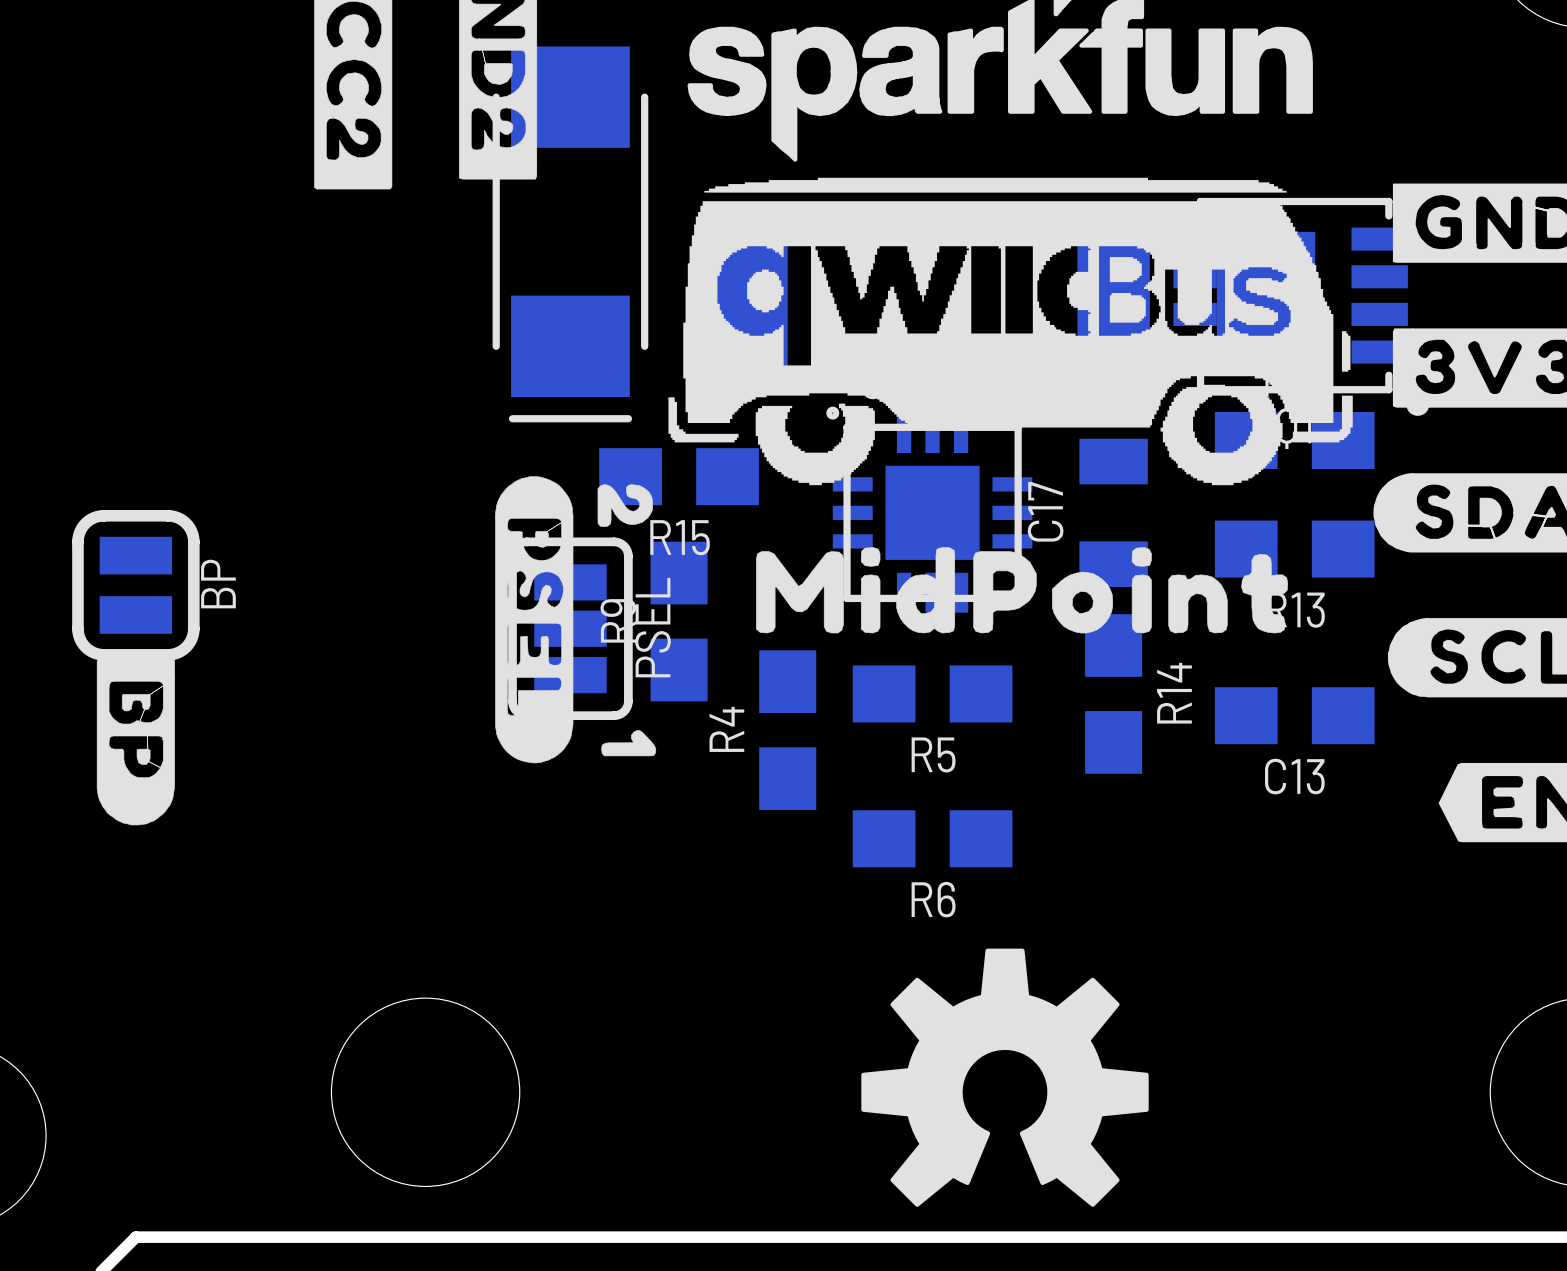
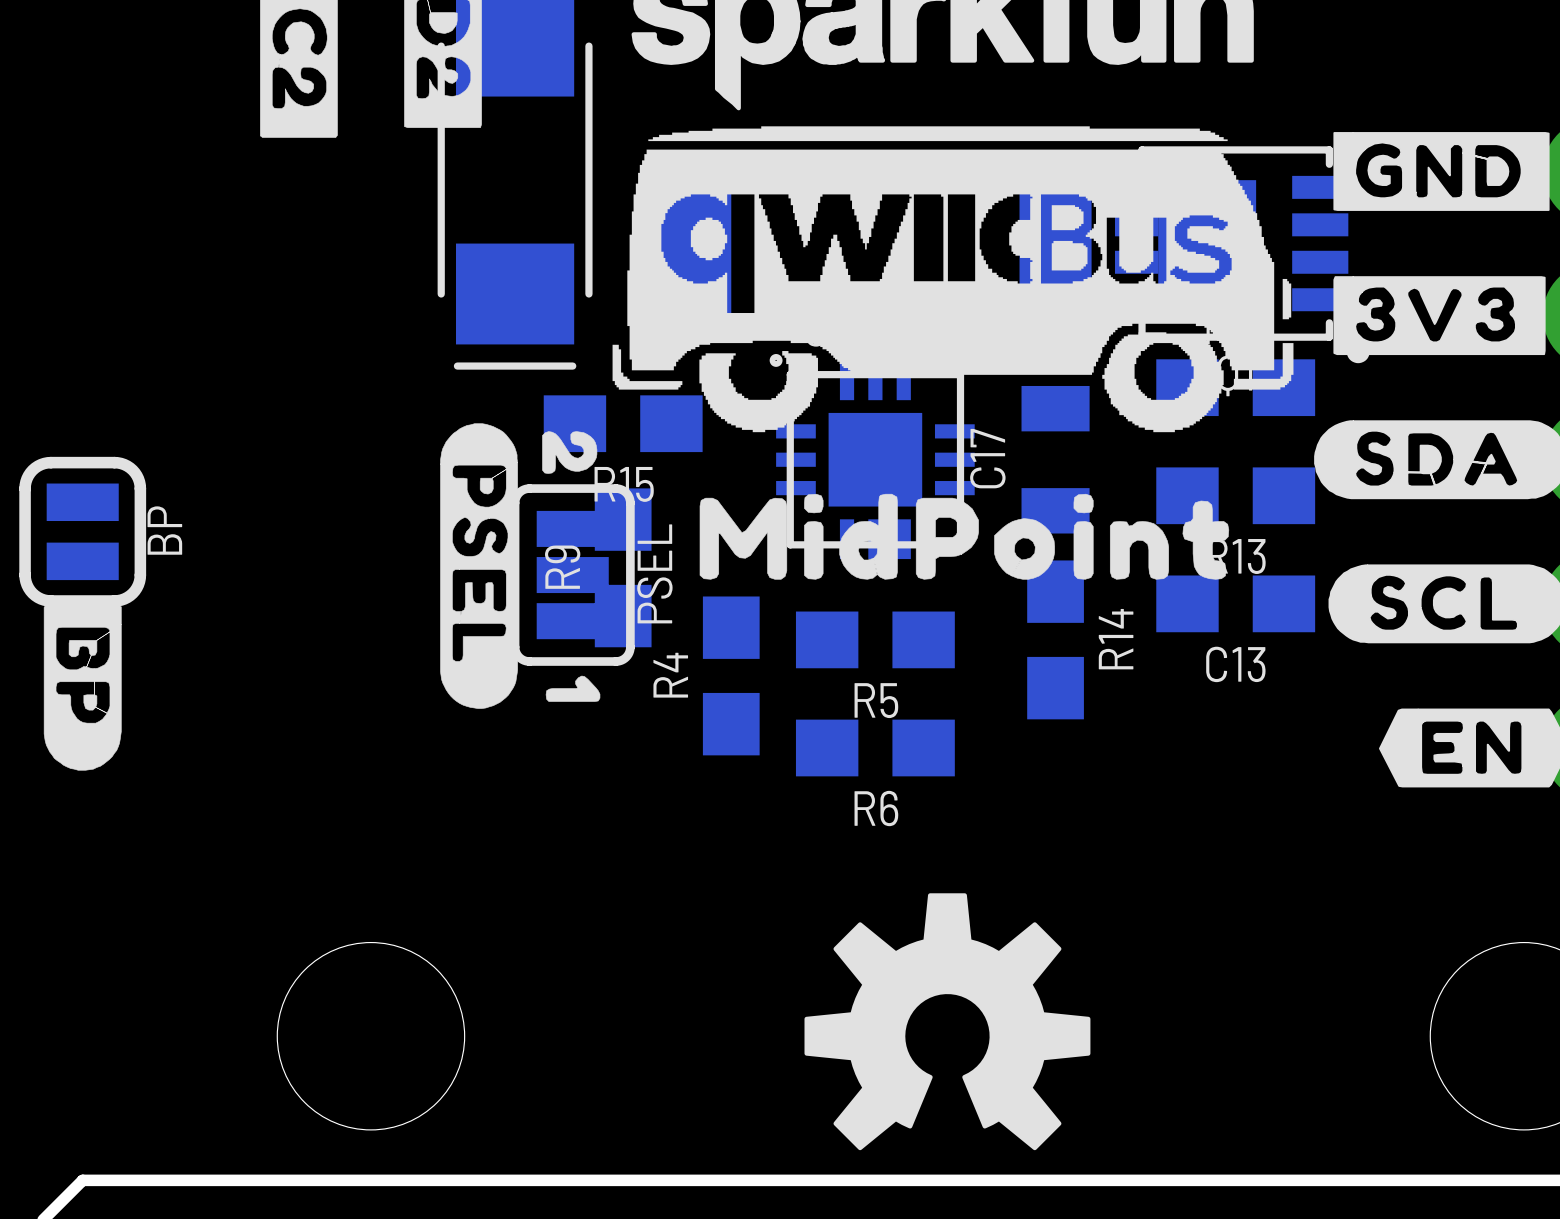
PSEL position: (570, 628) -> (572, 575)
C13 position: (1294, 715) -> (1235, 603)
R6 position: (932, 838) -> (875, 747)

